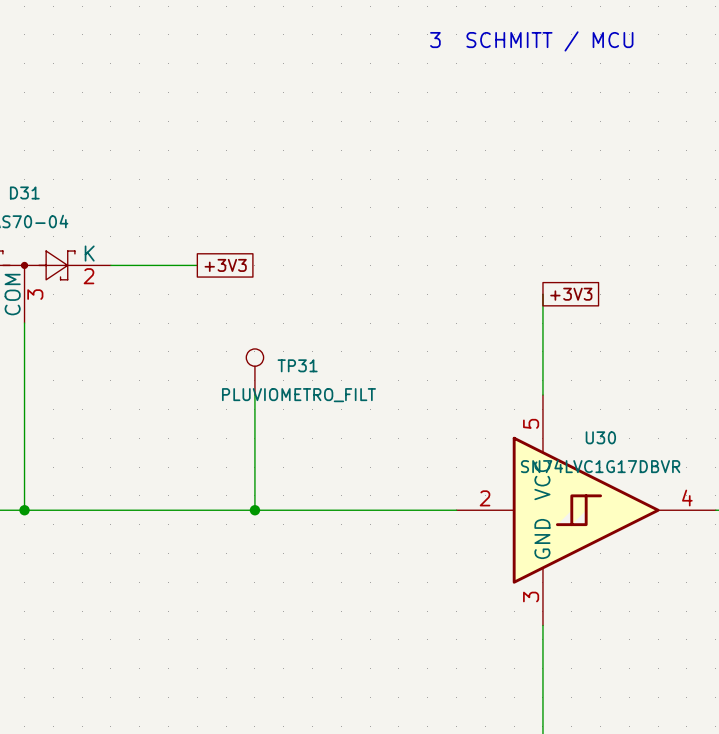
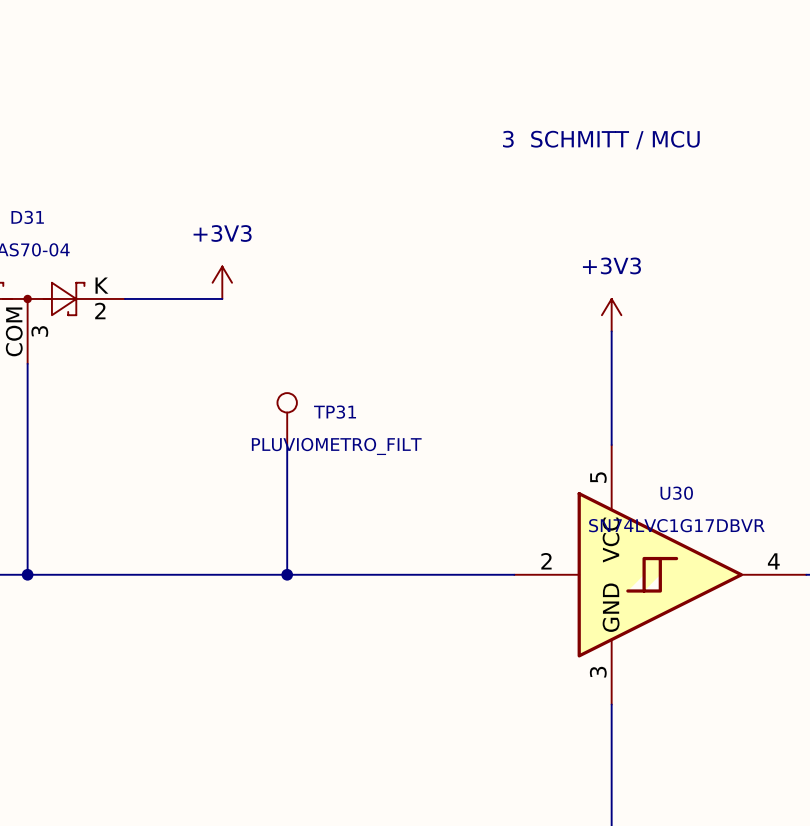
text position: 3 SCHMITT / MCU (531, 41) -> 3 SCHMITT / MCU (601, 140)
power symbol: none -> +3V3 (222, 282)
global label: +3V3 (225, 265) -> none
power symbol: none -> +3V3 (611, 315)
global label: +3V3 (571, 294) -> none

